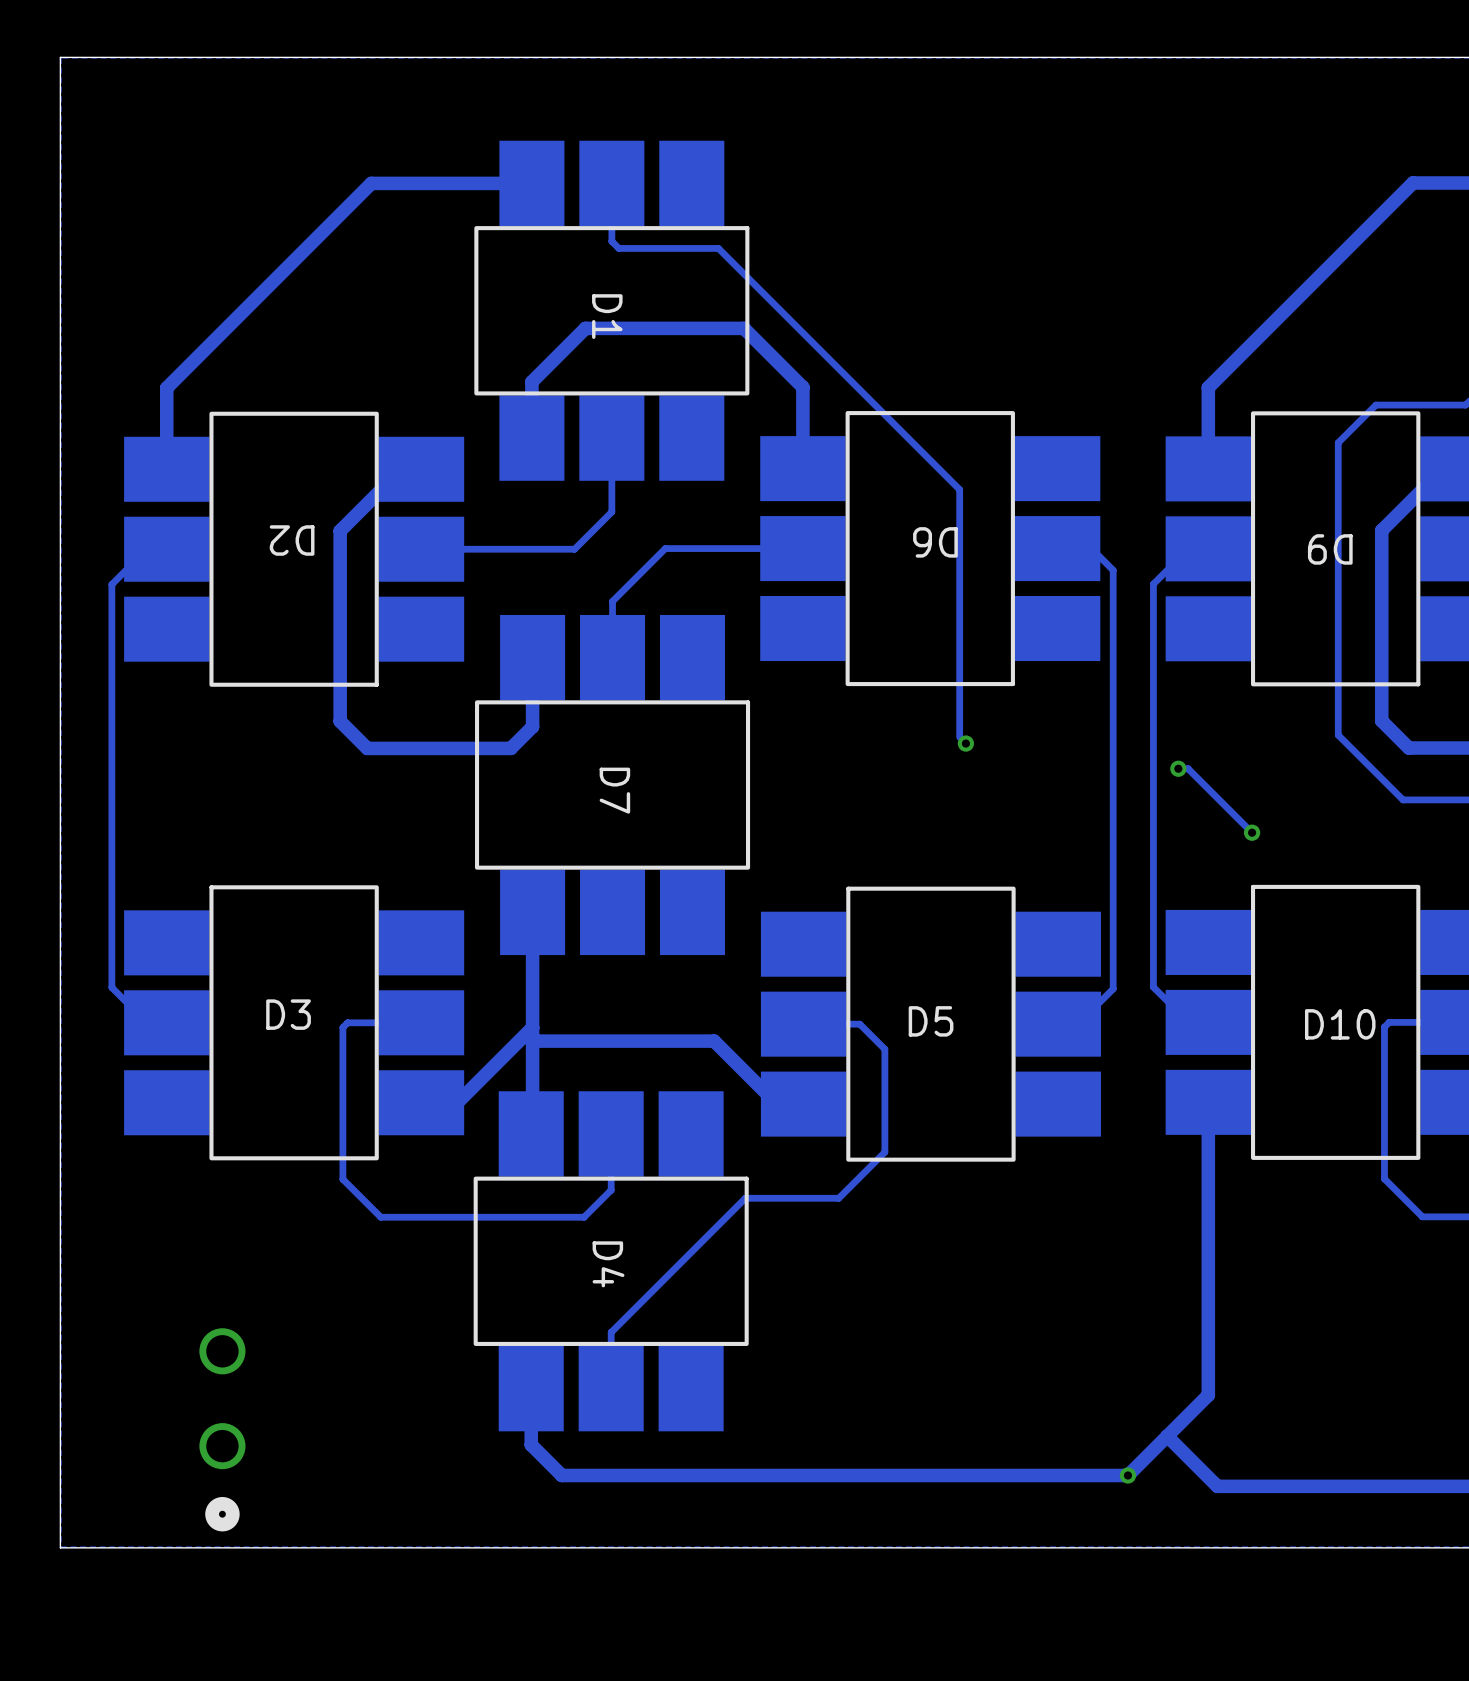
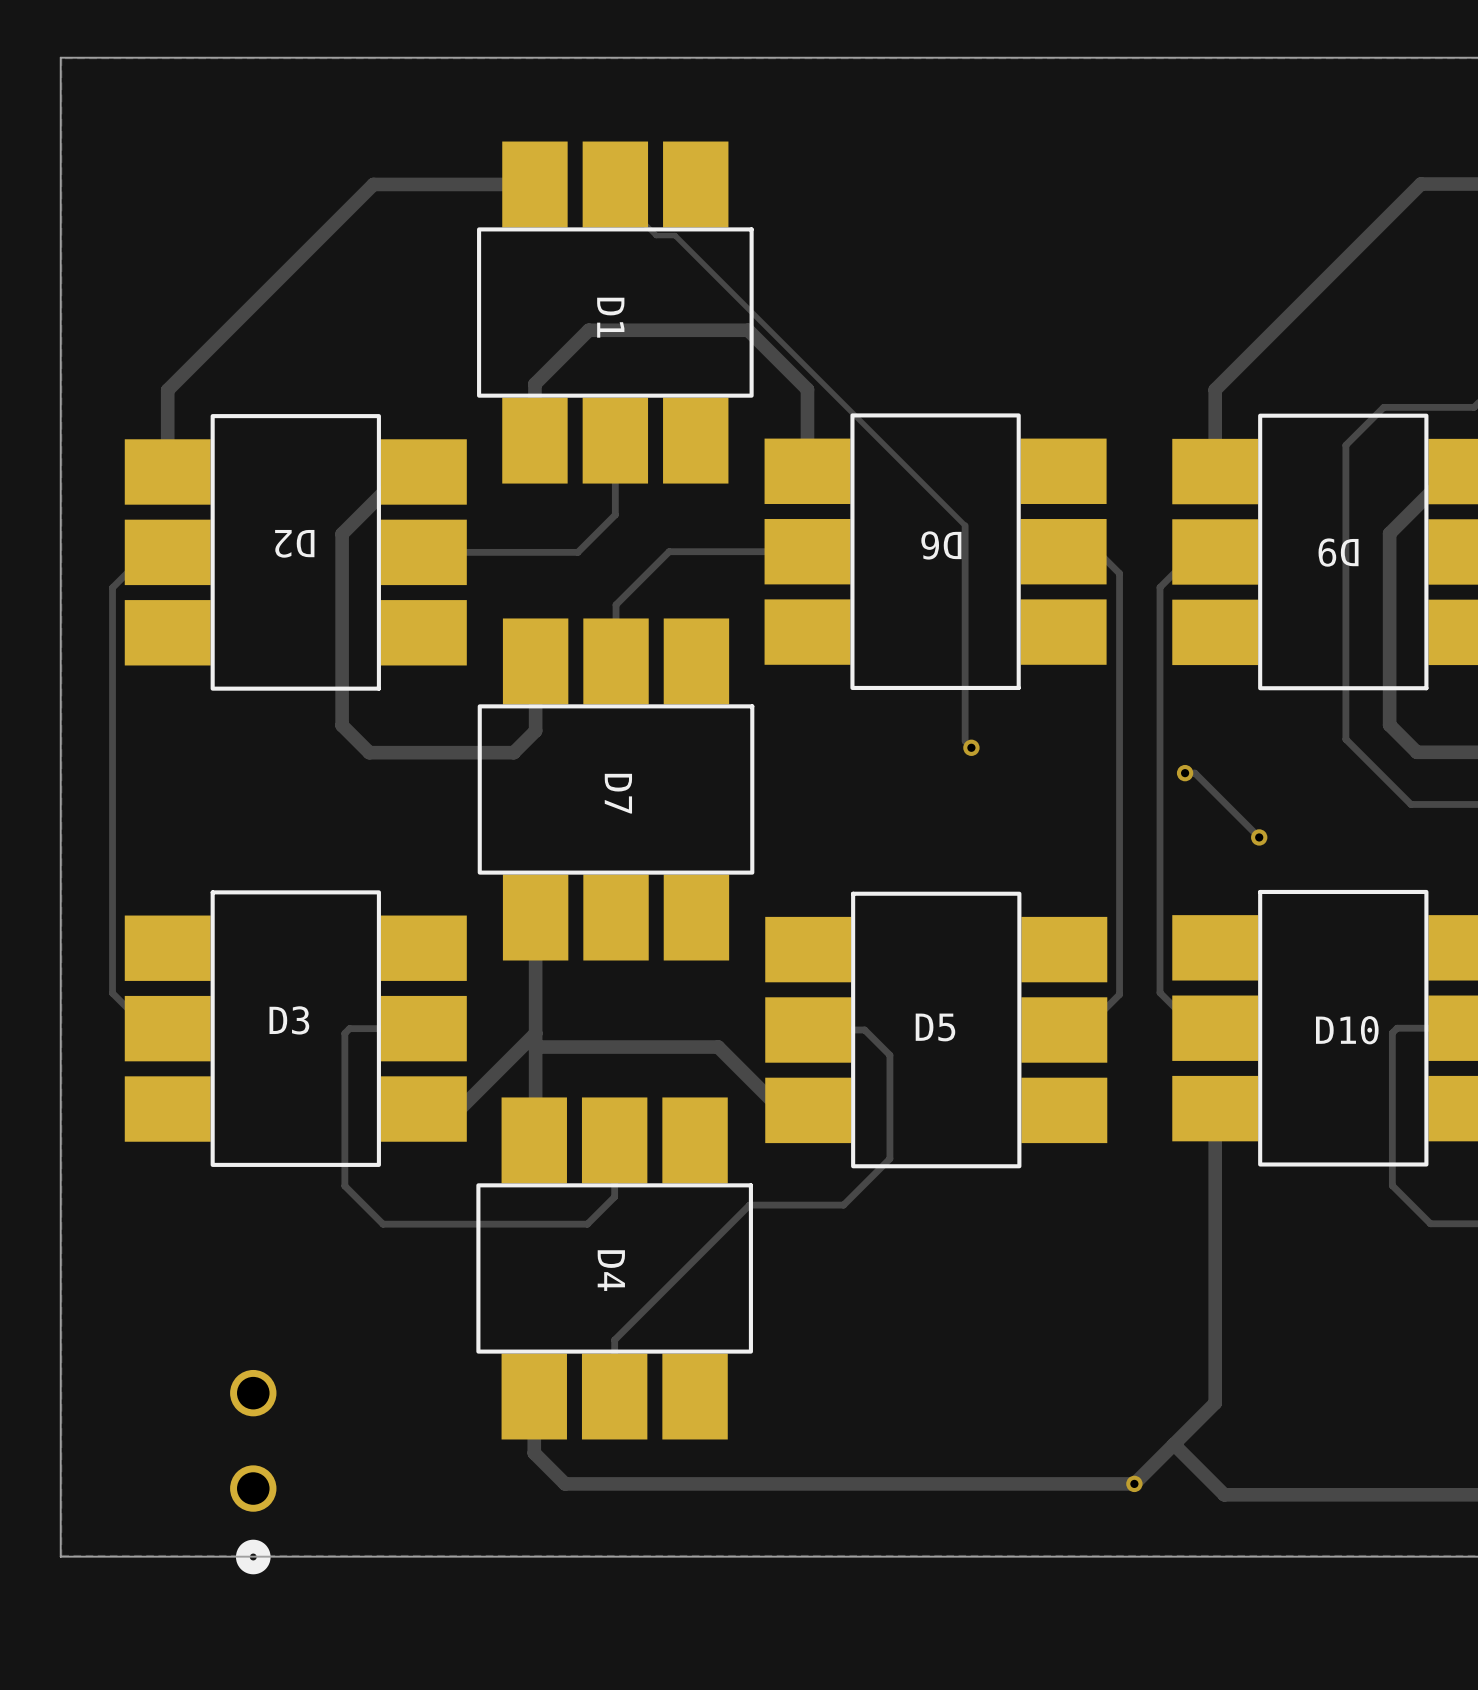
track: (611, 183) (611, 241) (618, 248) (718, 248) (959, 489) (959, 522) -> (615, 194) (656, 235) (675, 235) (965, 525)
part position: (222, 1429) -> (253, 1472)

